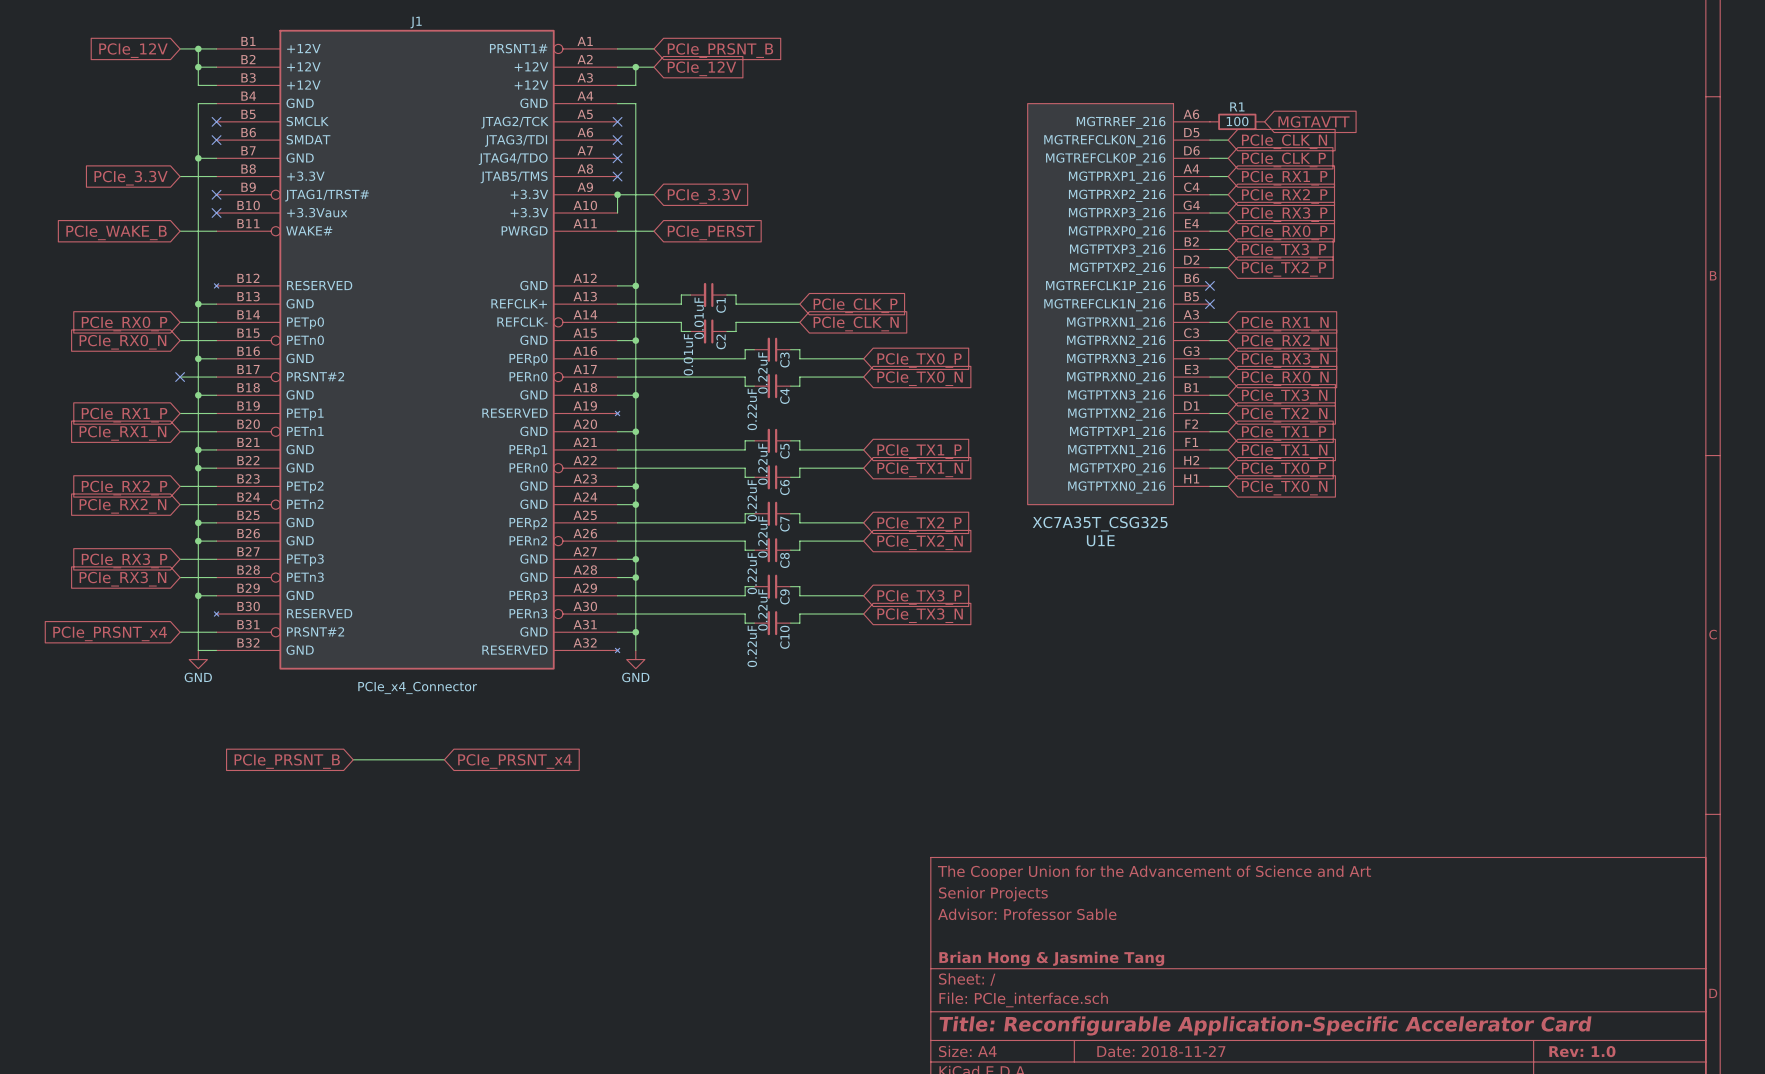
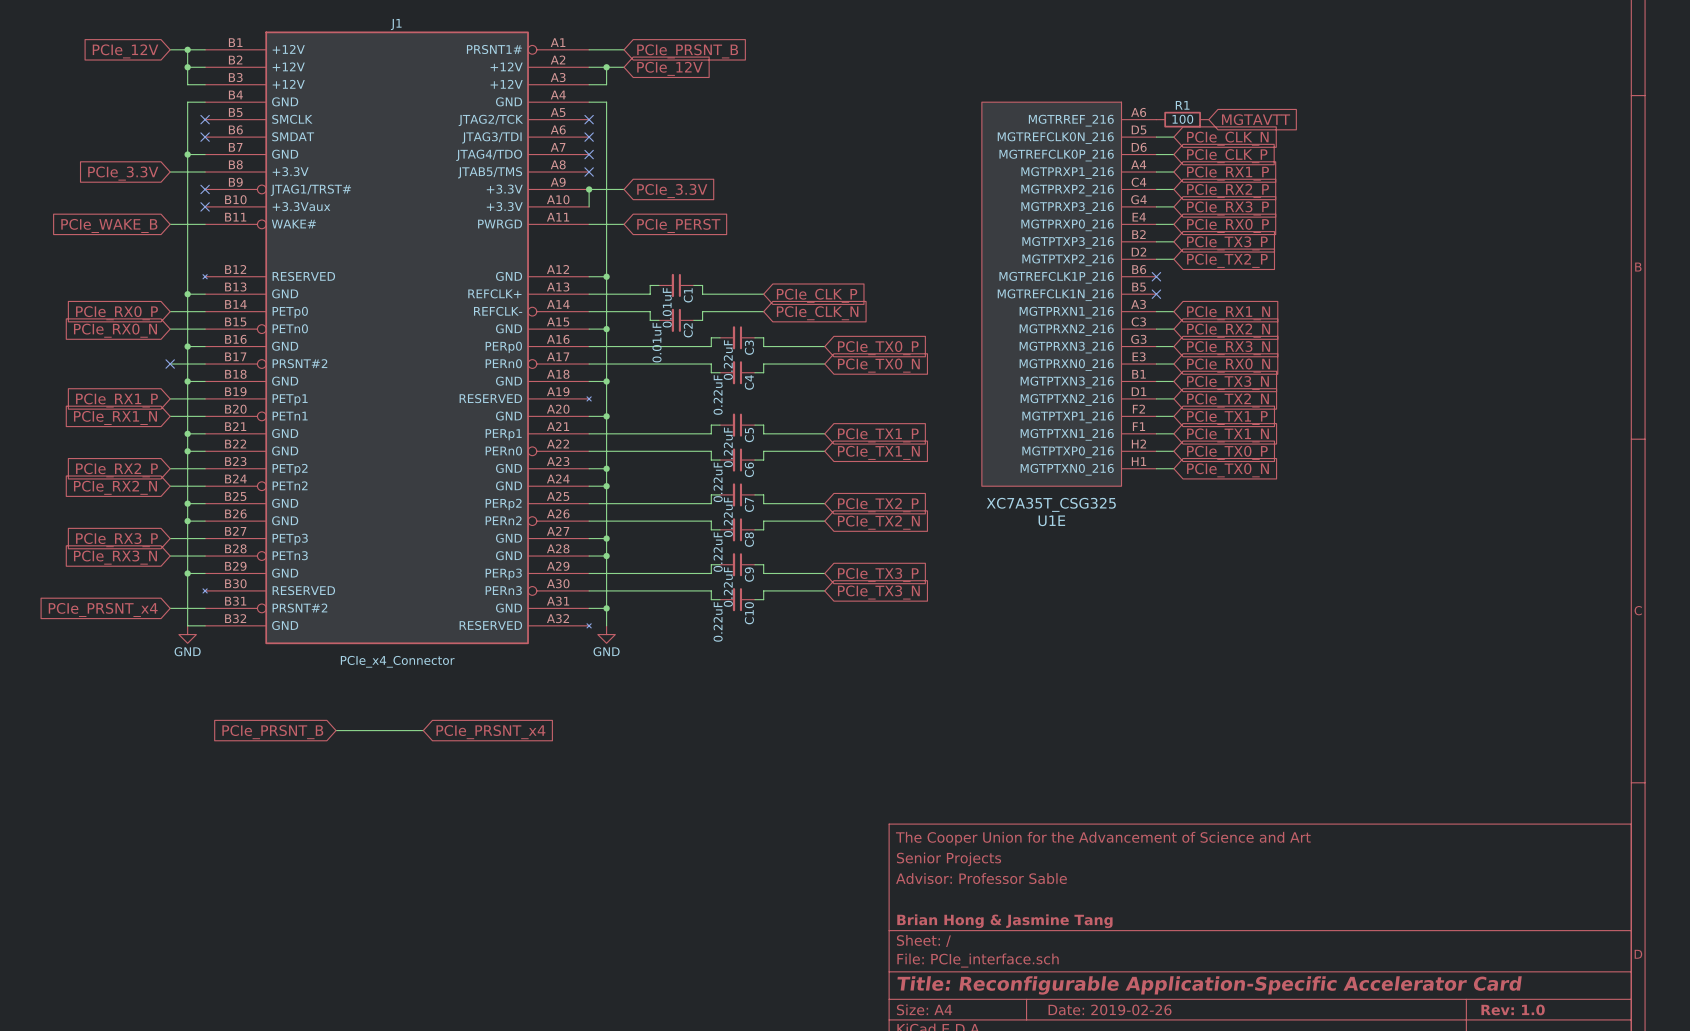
title block: Date: 2018-11-27 (1161, 1051) -> Date: 2019-02-26 (1110, 1009)

